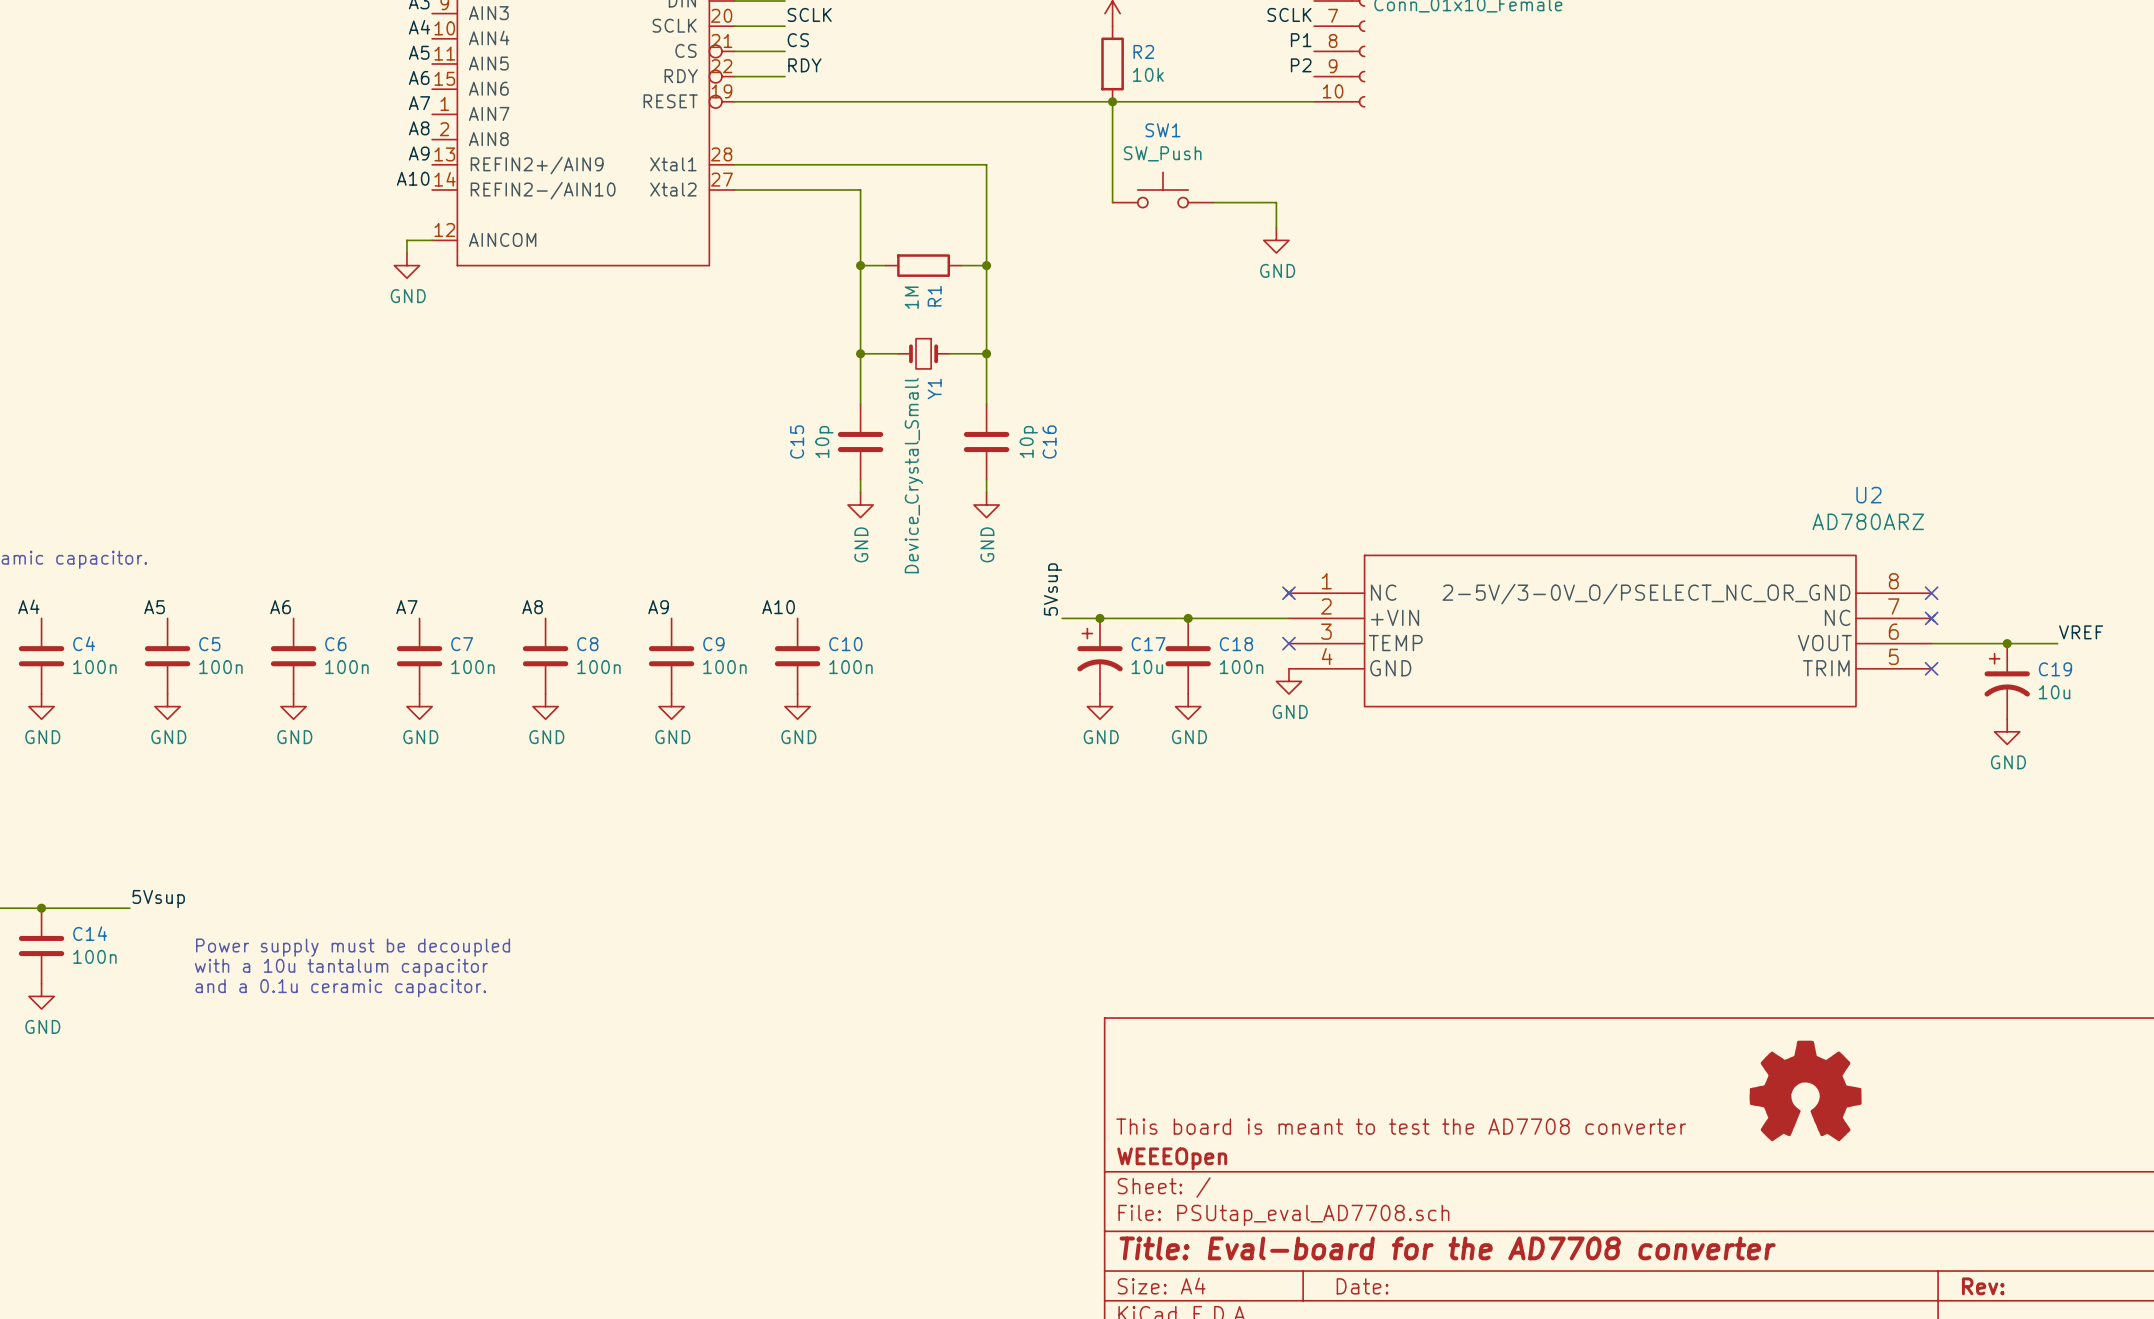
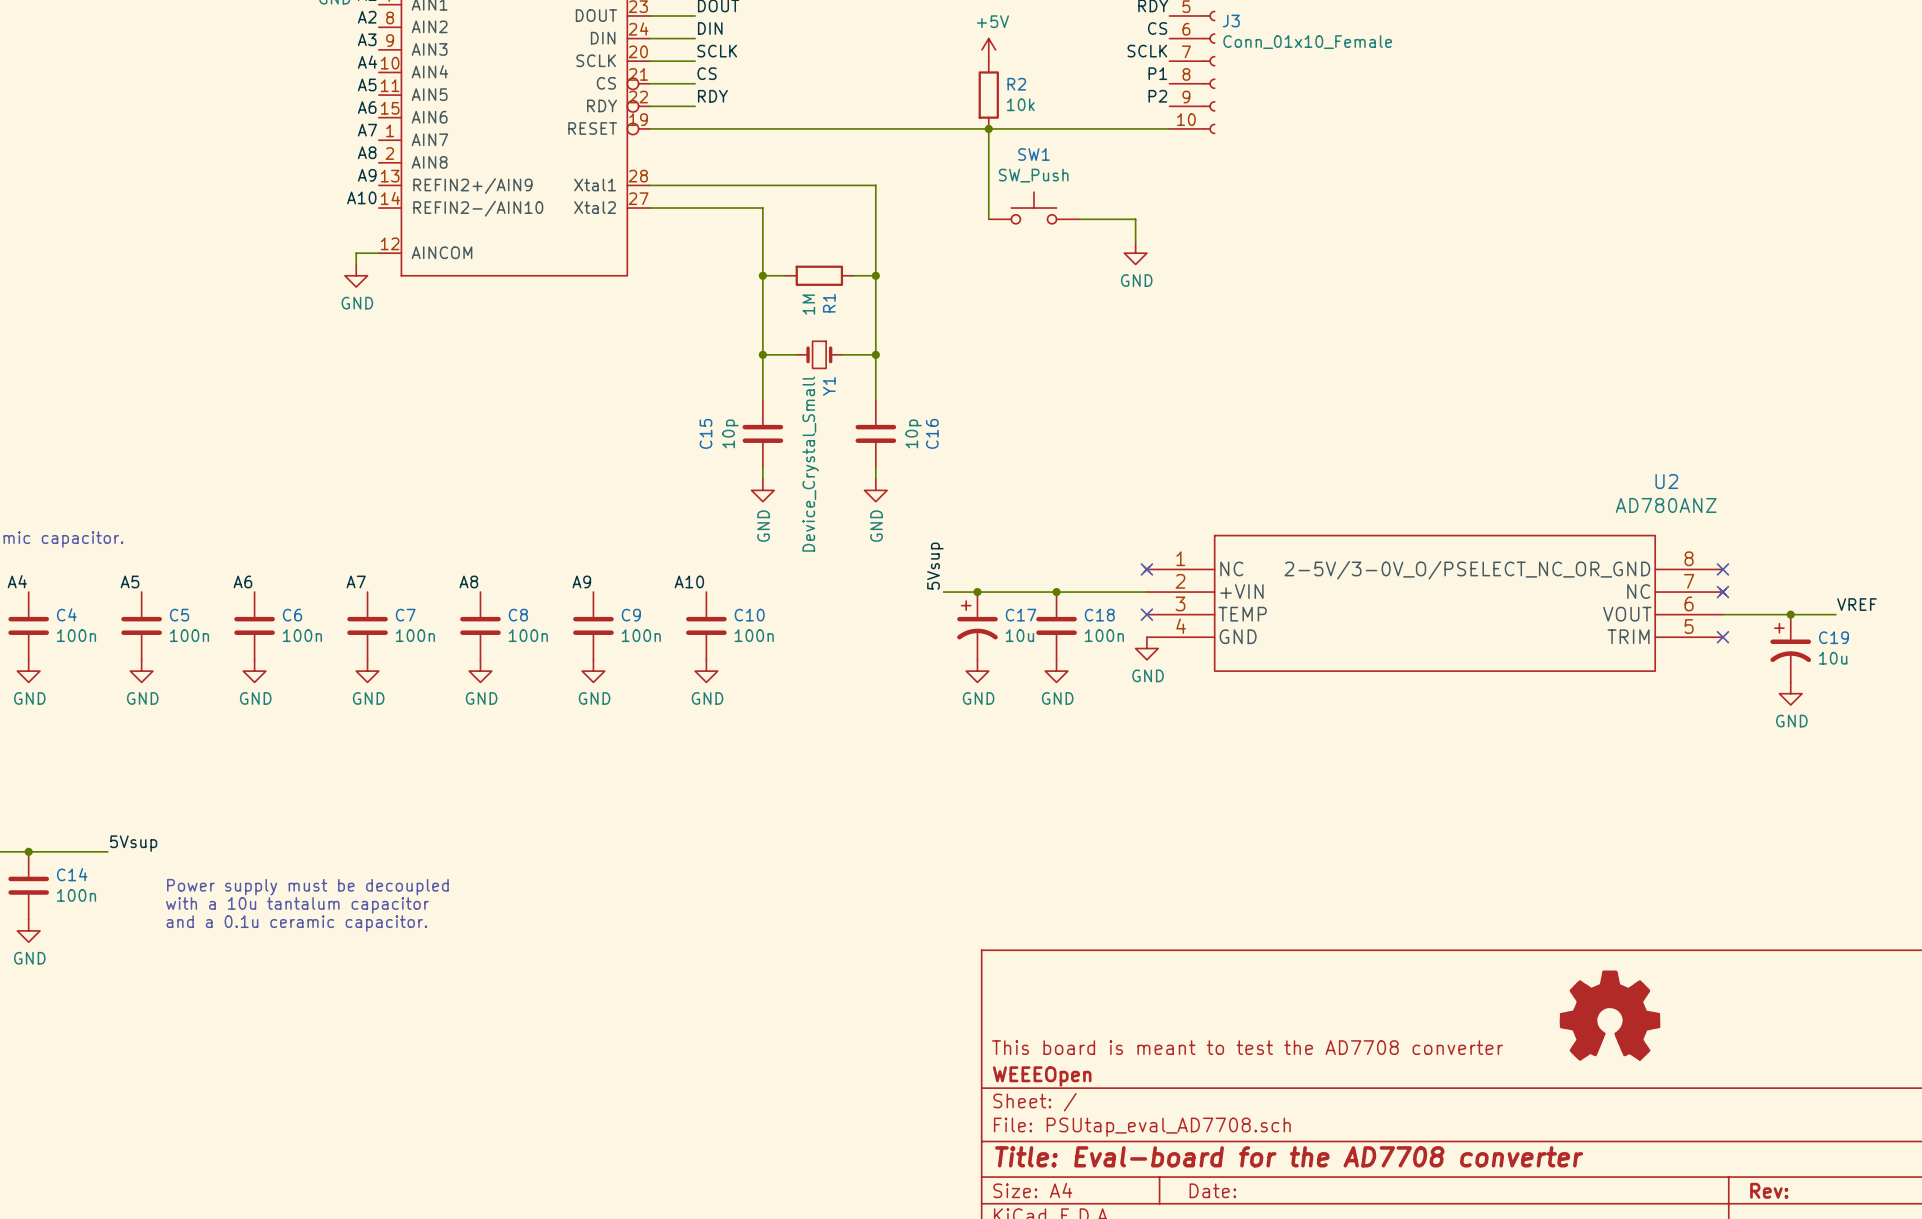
U2 value: AD780ARZ (1868, 521) -> AD780ANZ (1666, 505)

